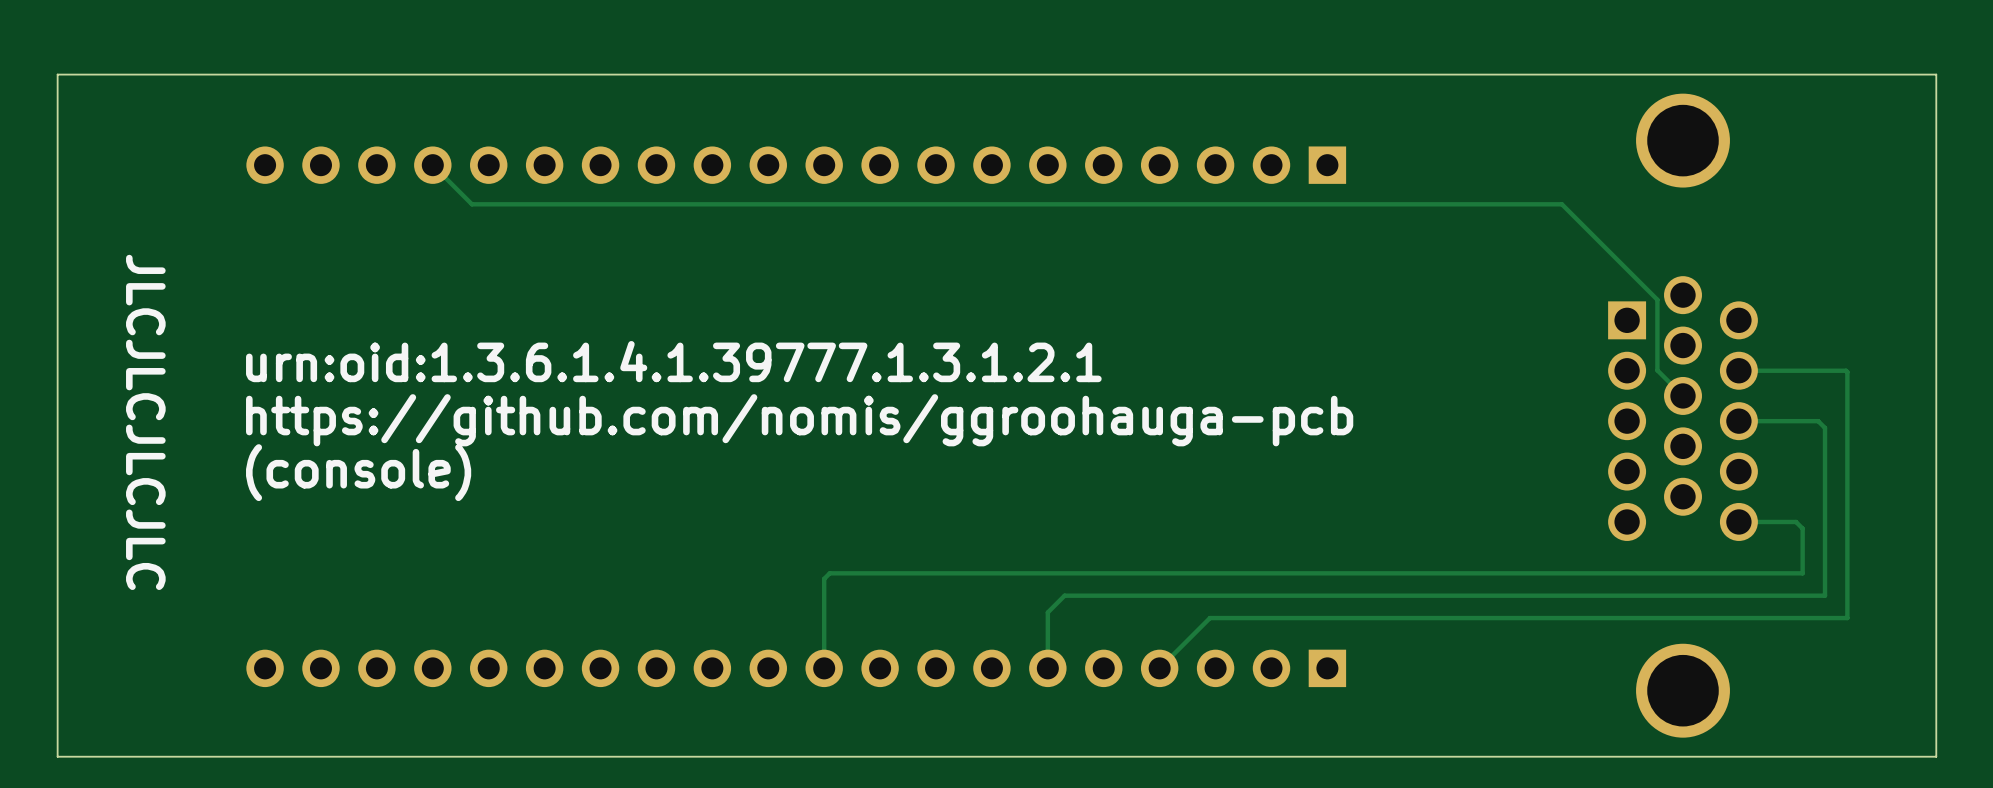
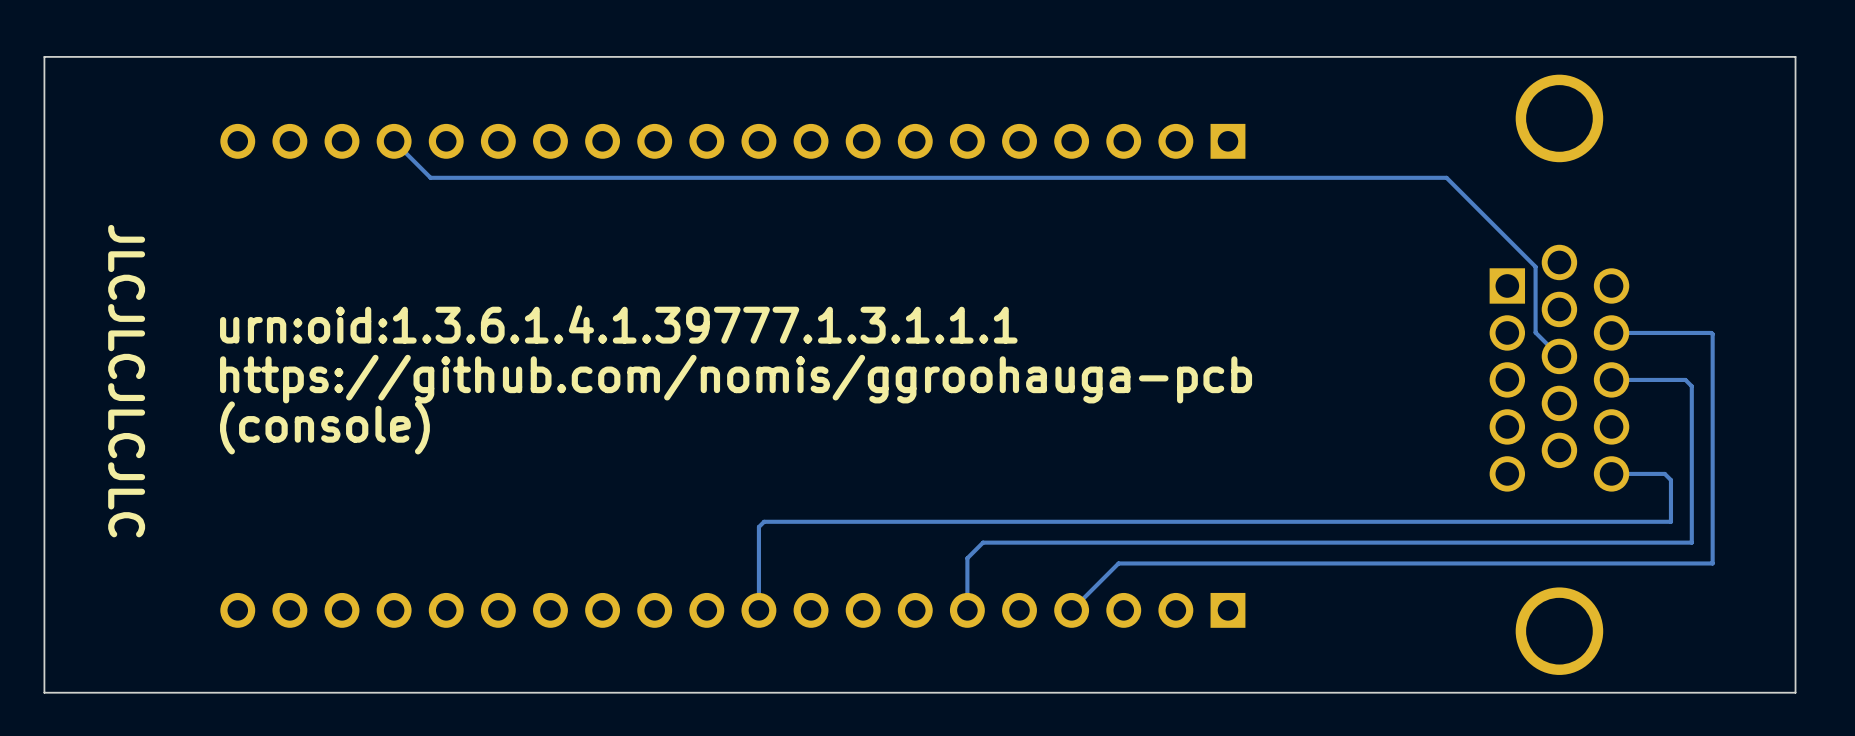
text: urn:oid:1.3.6.1.4.1.39777.1.3.1.2.1 (673, 361) -> urn:oid:1.3.6.1.4.1.39777.1.3.1.1.1 (618, 324)

